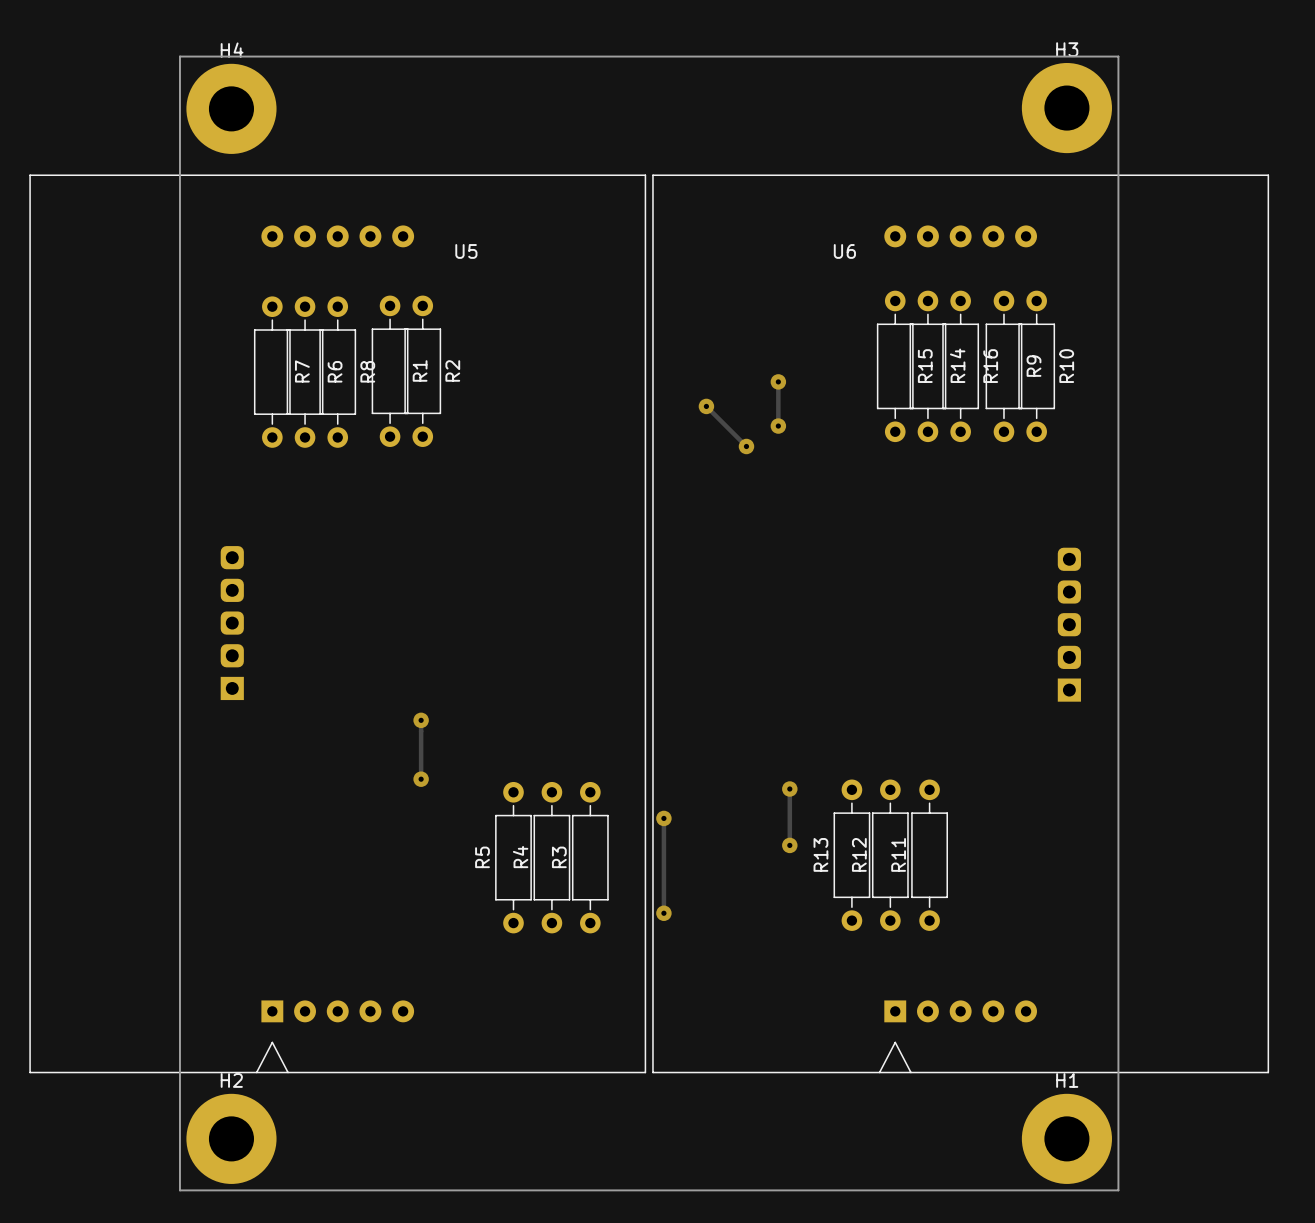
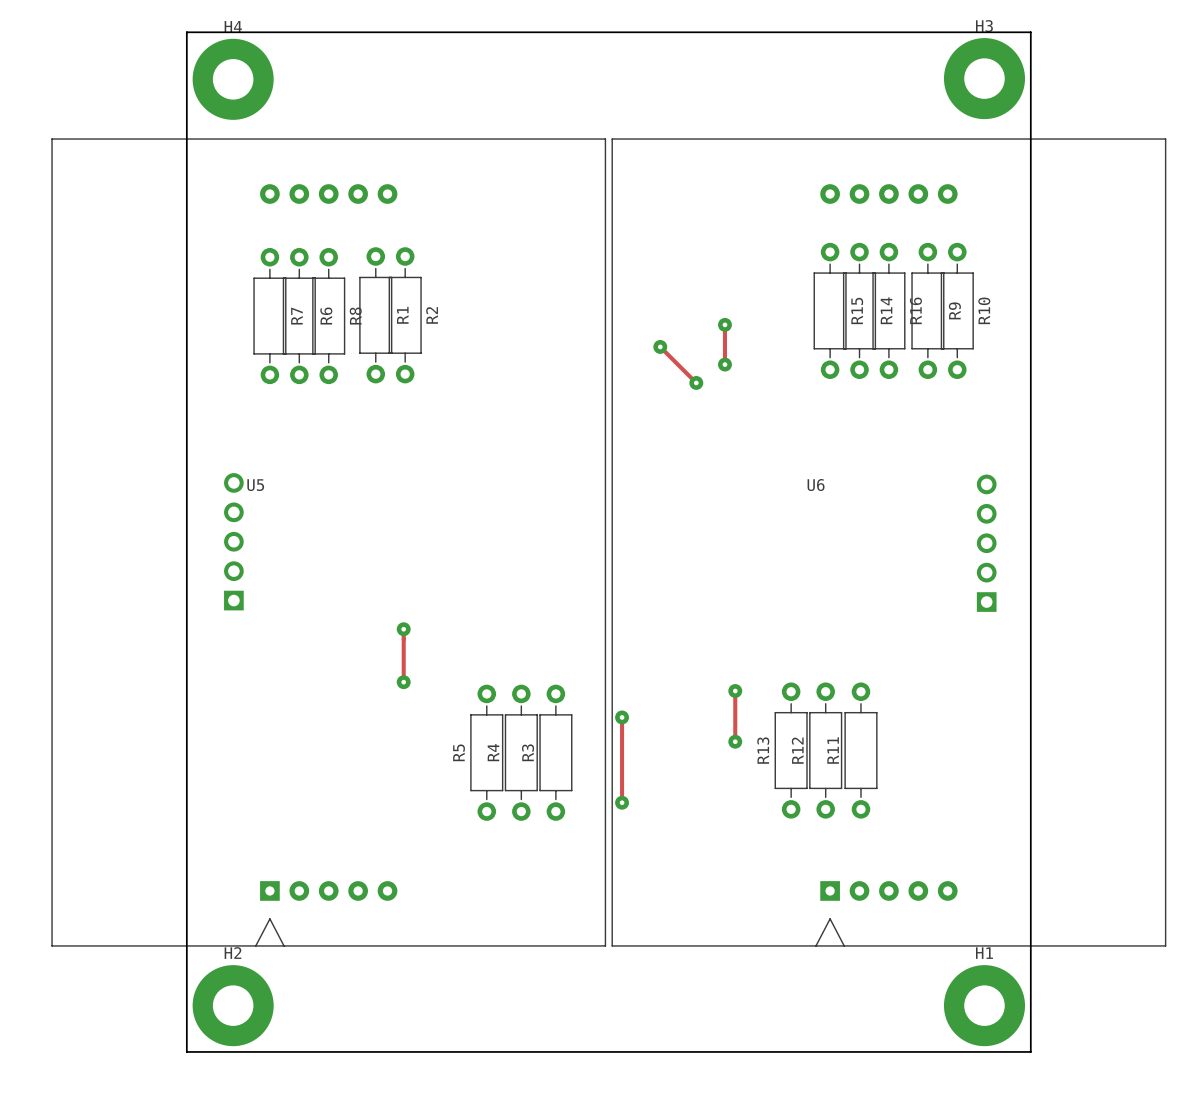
U5 name position: U5 (466, 251) -> U5 (255, 485)
U6 name position: U6 (844, 251) -> U6 (816, 485)
part footprint: [220, 546, 244, 701] -> [224, 473, 244, 611]
part footprint: [1057, 547, 1081, 702] -> [976, 474, 997, 612]

